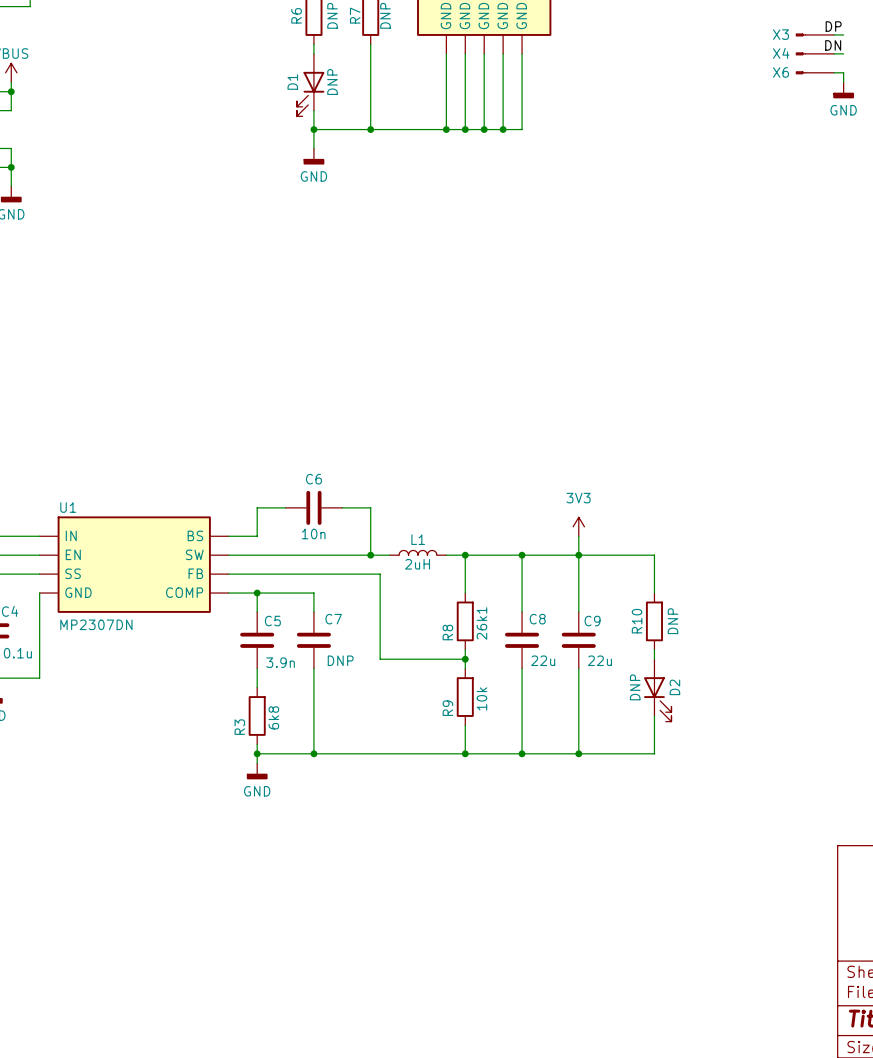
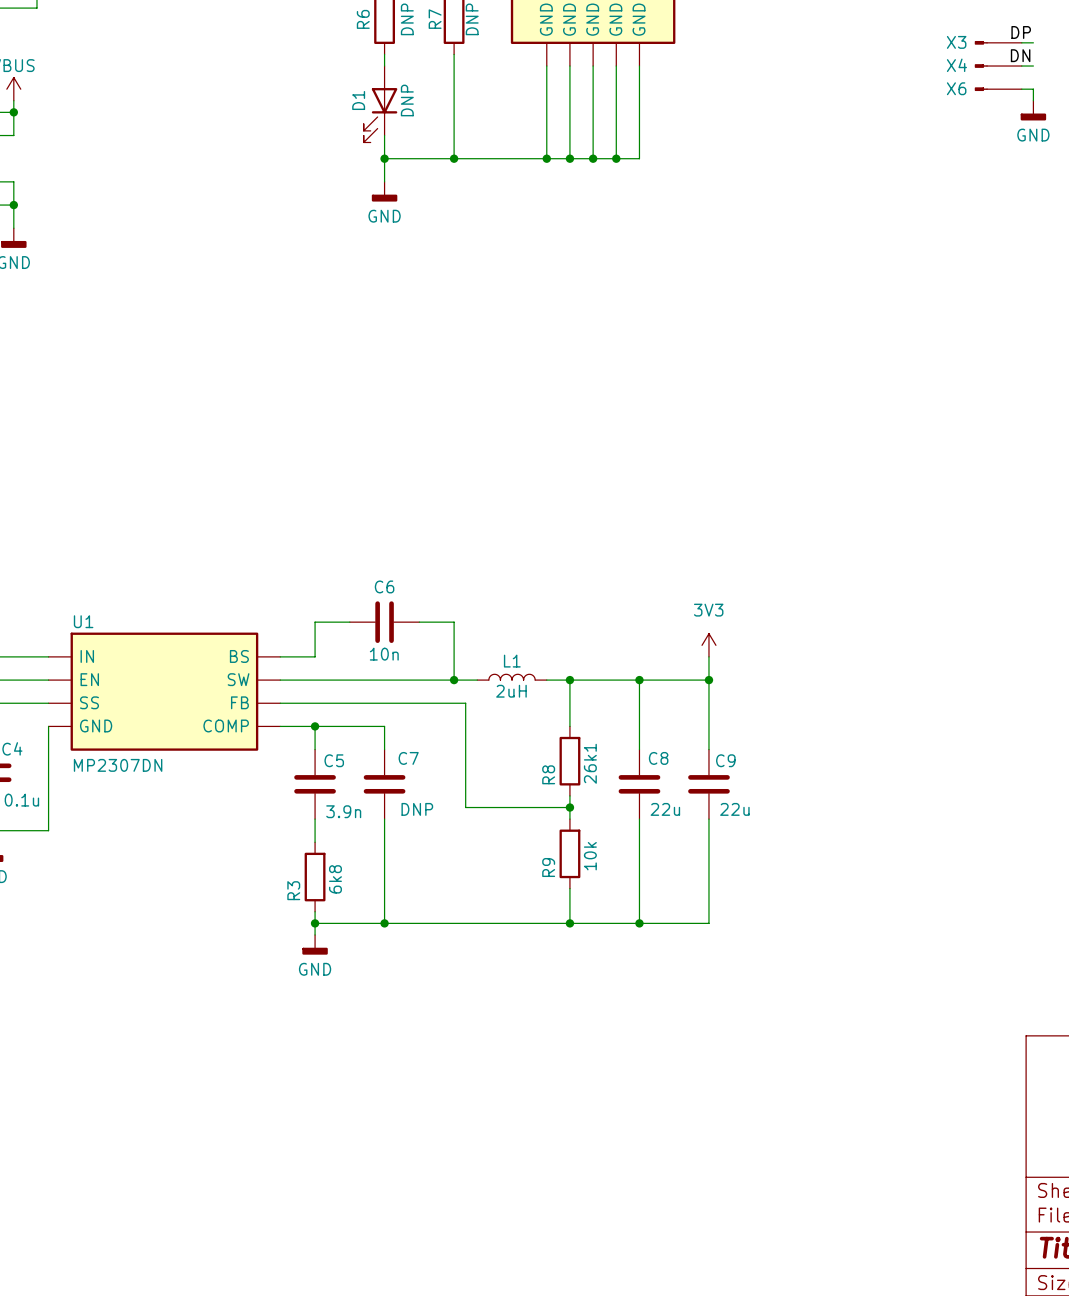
wire: (578, 555) (654, 555) (654, 593) -> none
R10: DNP (654, 621) -> none
wire: (654, 649) (654, 659) -> none
D2: DNP (657, 690) -> none
wire: (654, 715) (654, 753) (578, 753) -> none
junction: (578, 753) -> none

